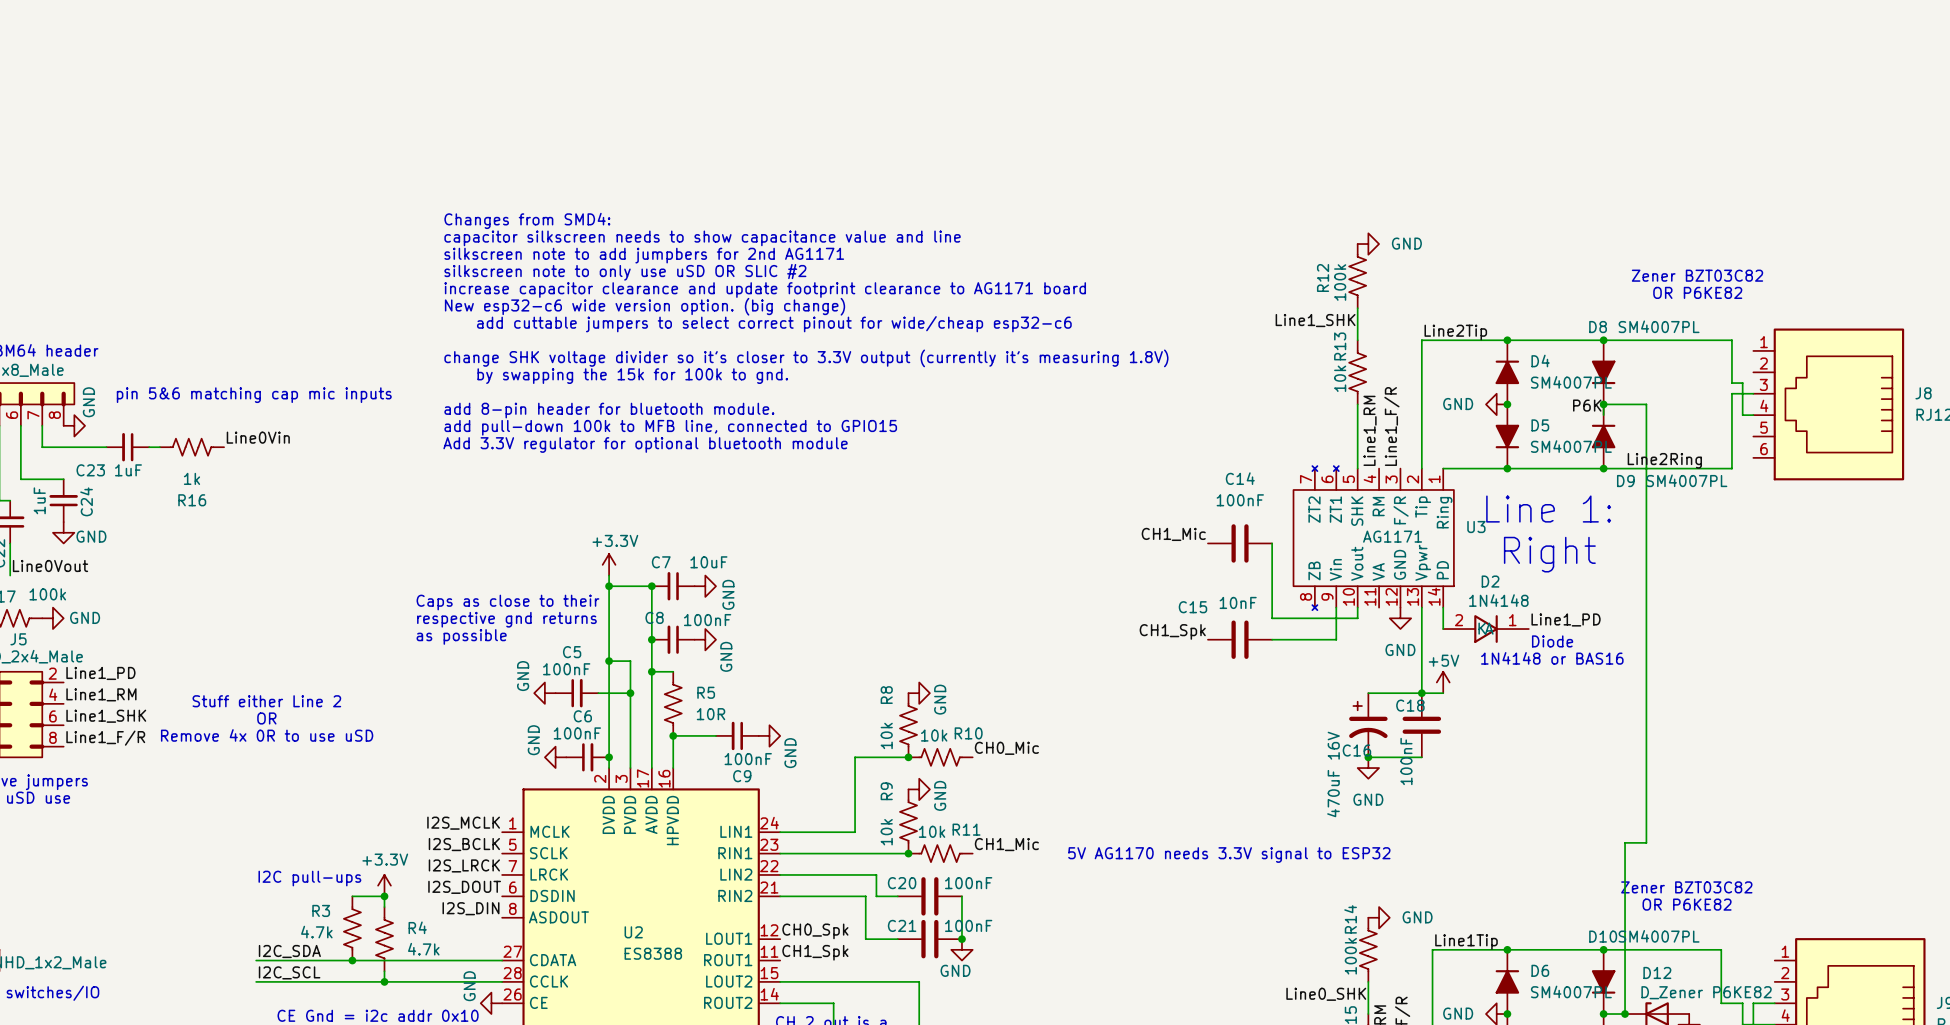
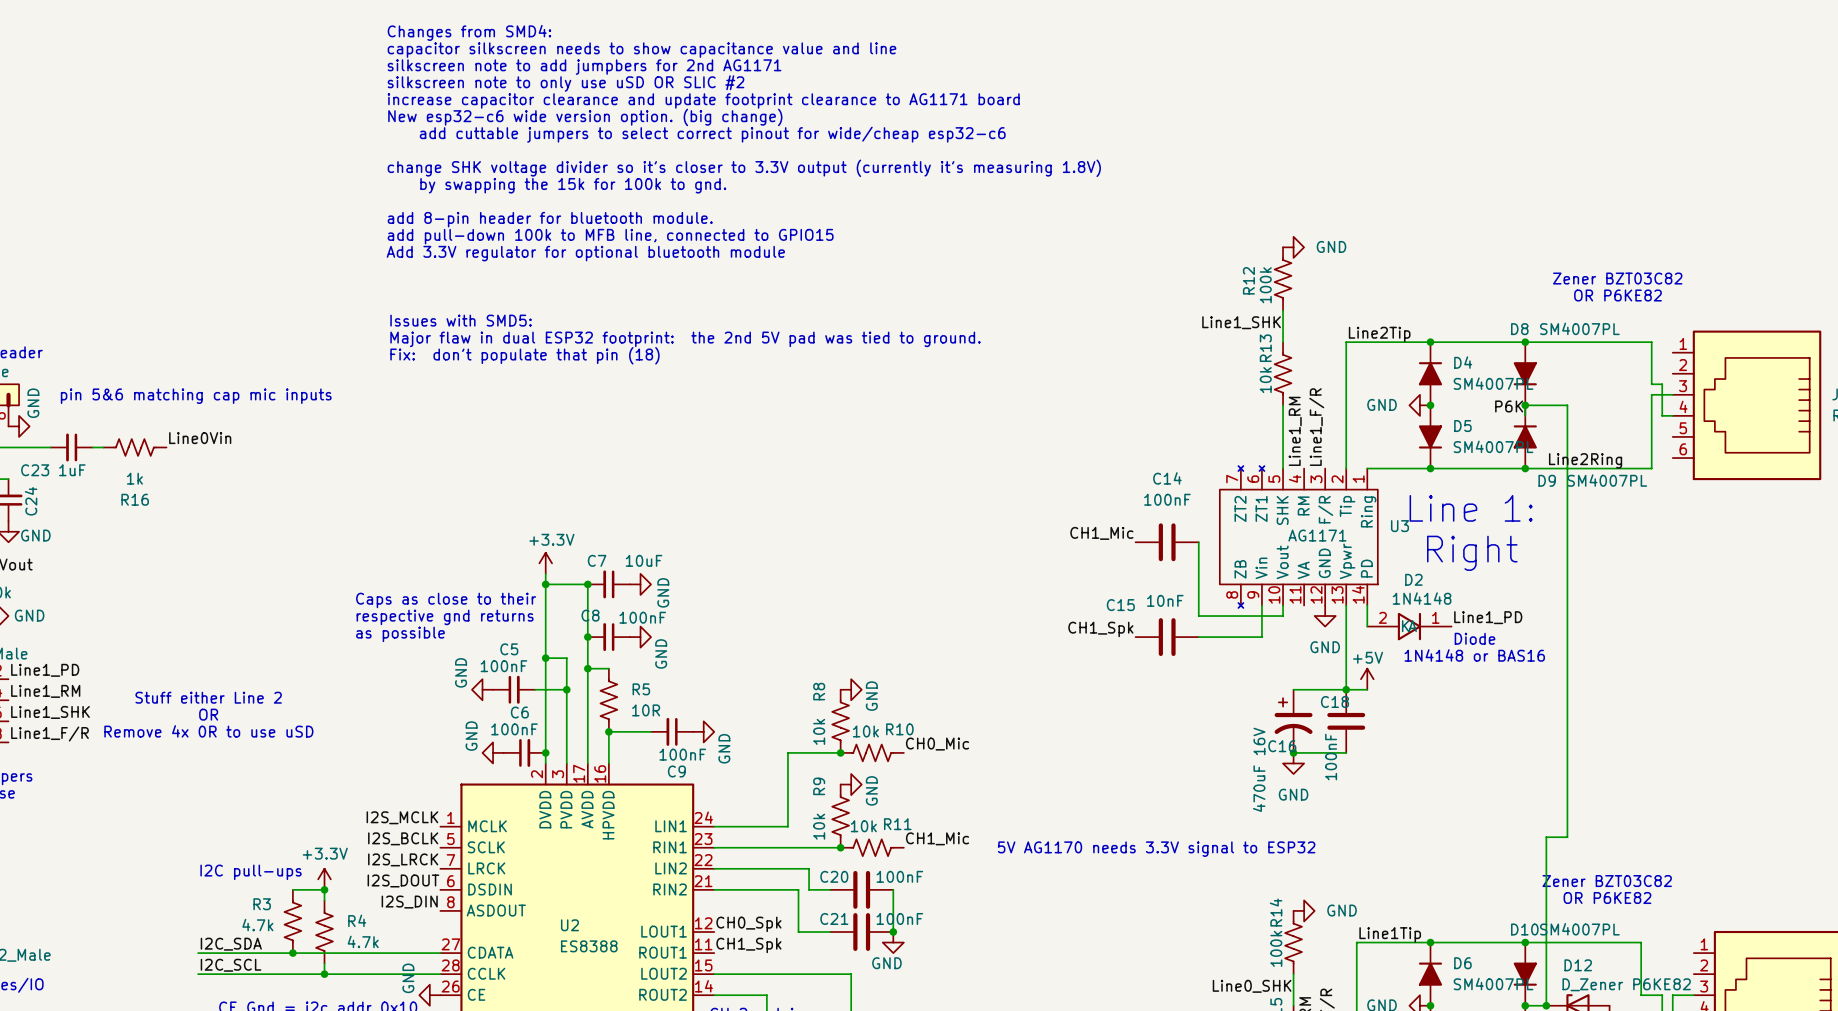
text position: Changes from SMD4: (527, 220) -> Changes from SMD4: (469, 32)
text position: capacitor silkscreen needs to show capacitance value and line (702, 238) -> capacitor silkscreen needs to show capacitance value and line (641, 50)
text position: silkscreen note to add jumpbers for 2nd AG1171 (644, 255) -> silkscreen note to add jumpbers for 2nd AG1171 (584, 67)
text position: silkscreen note to only use uSD OR SLIC #2 (625, 272) -> silkscreen note to only use uSD OR SLIC #2 (566, 83)
text position: increase capacitor clearance and update footprint clearance to AG1171 board (765, 290) -> increase capacitor clearance and update footprint clearance to AG1171 board (703, 100)
text position: New esp32-c6 wide version option. (big change) (645, 306) -> New esp32-c6 wide version option. (big change) (585, 117)
text: none -> Issues with SMD5: (461, 320)
text position: add cuttable jumpers to select correct pinout for wide/cheap esp32-c6 (774, 324) -> add cuttable jumpers to select correct pinout for wide/cheap esp32-c6 (712, 134)
text: none -> Major flaw in dual ESP32 footprint: the 2nd 5V pad was tied to ground. (685, 339)
text: none -> Fix: don't populate that pin (18) (524, 355)
text position: change SHK voltage divider so it's closer to 3.3V output (currently it's measuring 1.8V) (806, 358) -> change SHK voltage divider so it's closer to 3.3V output (currently it's measuring 1.8V) (744, 168)
text position: by swapping the 15k for 100k to gnd. (632, 376) -> by swapping the 15k for 100k to gnd. (573, 185)
text position: add 8-pin header for bluetooth module. (609, 410) -> add 8-pin header for bluetooth module. (550, 219)
text position: add pull-down 100k to MFB line, connected to GPIO15 (670, 427) -> add pull-down 100k to MFB line, connected to GPIO15 (610, 236)
text position: Add 3.3V regulator for optional bluetooth module (645, 444) -> Add 3.3V regulator for optional bluetooth module (585, 253)

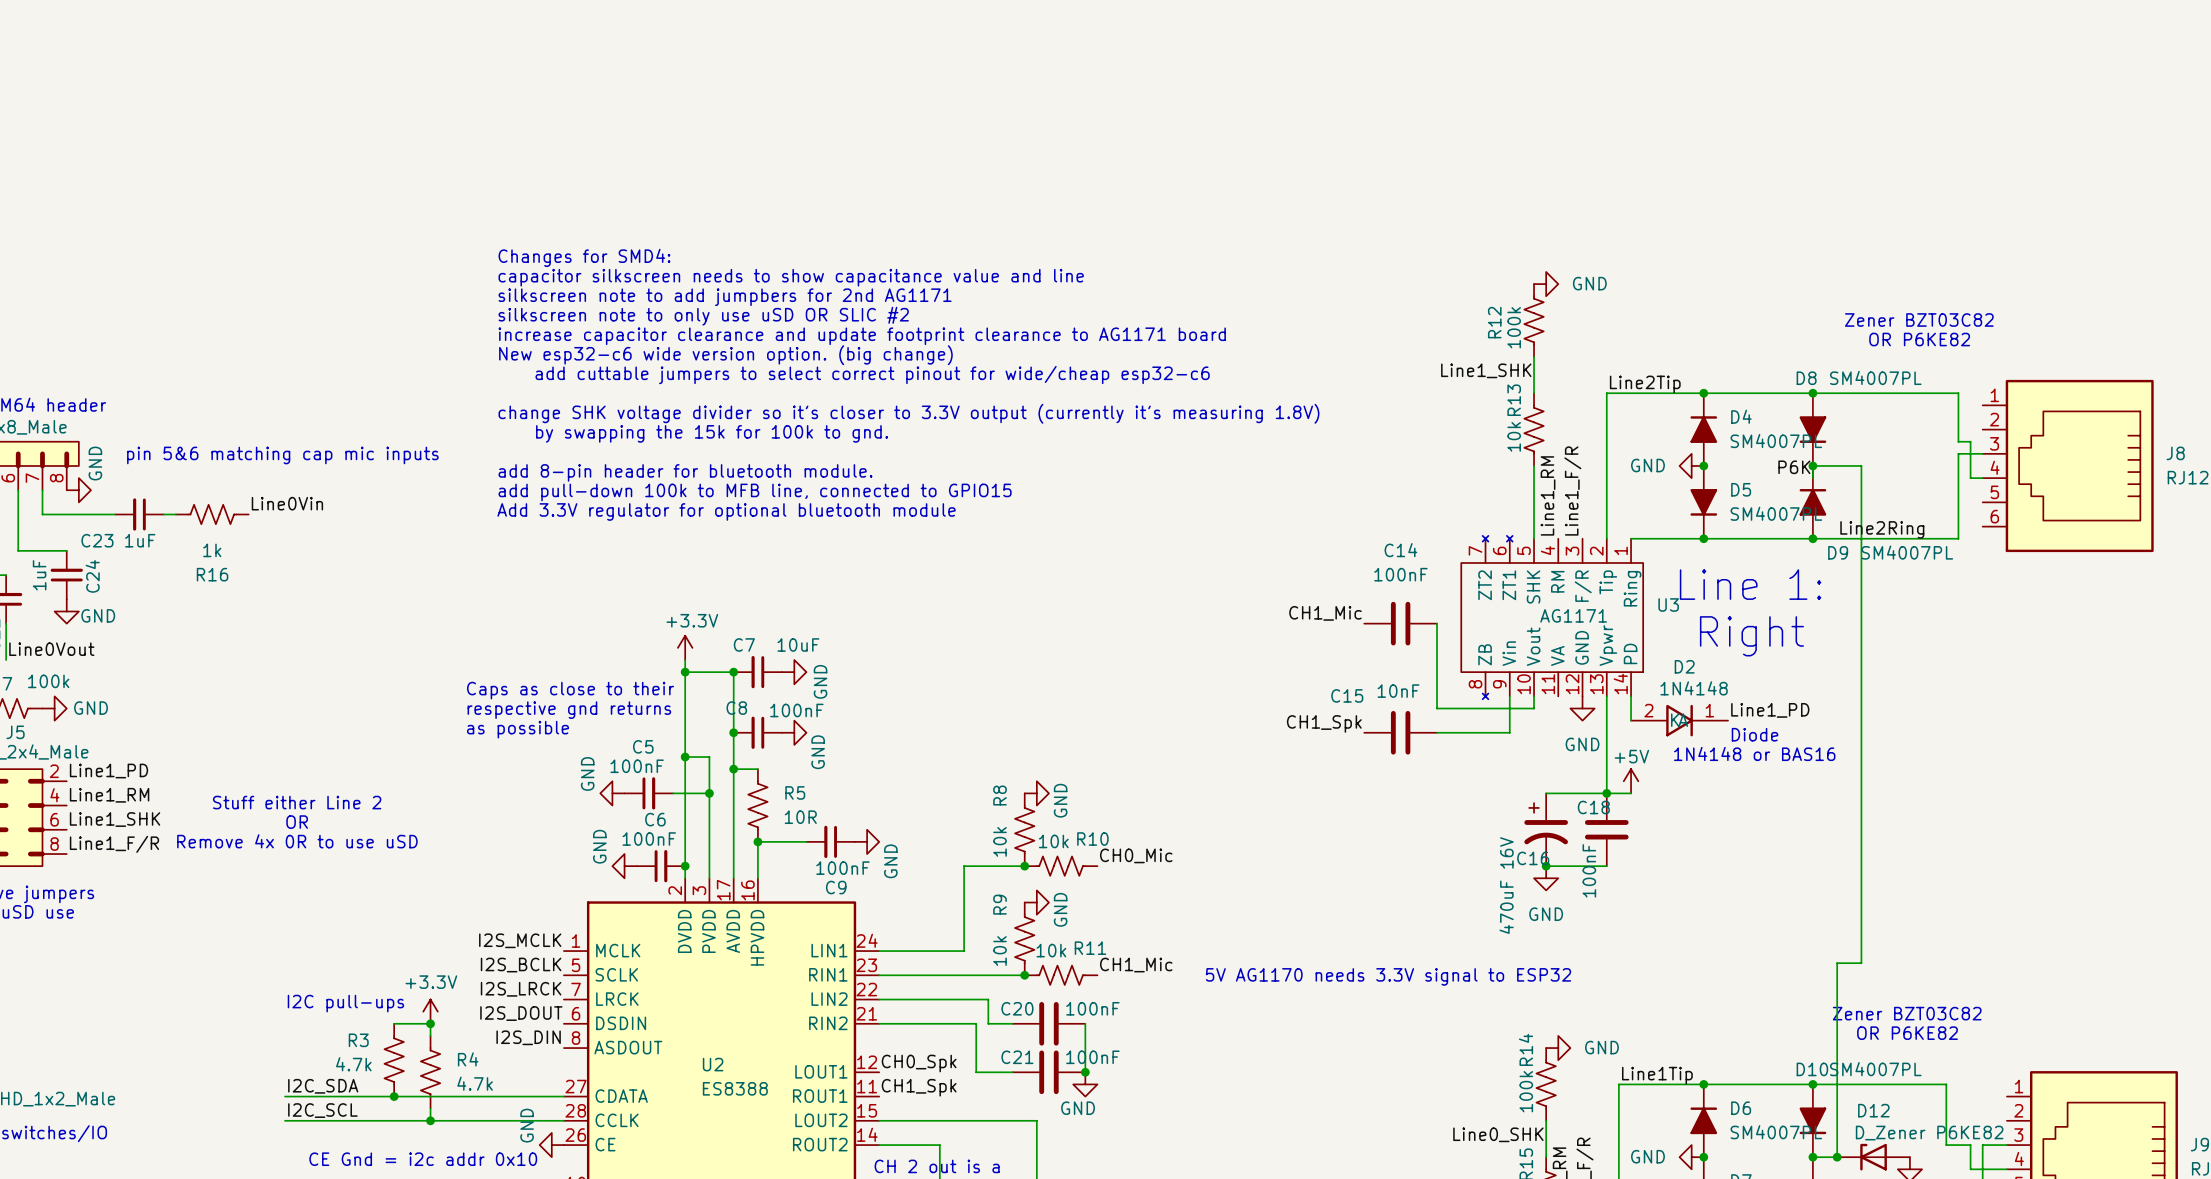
text: Changes from SMD4: (469, 32) -> none
text position: capacitor silkscreen needs to show capacitance value and line (641, 50) -> capacitor silkscreen needs to show capacitance value and line (791, 277)
text position: silkscreen note to add jumpbers for 2nd AG1171 (584, 67) -> silkscreen note to add jumpbers for 2nd AG1171 (725, 297)
text position: silkscreen note to only use uSD OR SLIC #2 (566, 83) -> silkscreen note to only use uSD OR SLIC #2 (703, 316)
text position: increase capacitor clearance and update footprint clearance to AG1171 board (703, 100) -> increase capacitor clearance and update footprint clearance to AG1171 board (862, 336)
text position: New esp32-c6 wide version option. (big change) (585, 117) -> New esp32-c6 wide version option. (big change) (725, 355)
text position: add cuttable jumpers to select correct pinout for wide/cheap esp32-c6 (712, 134) -> add cuttable jumpers to select correct pinout for wide/cheap esp32-c6 (872, 375)
text position: change SHK voltage divider so it's closer to 3.3V output (currently it's measuring 1.8V) (744, 168) -> change SHK voltage divider so it's closer to 3.3V output (currently it's measuring 1.8V) (908, 413)
text position: by swapping the 15k for 100k to gnd. (573, 185) -> by swapping the 15k for 100k to gnd. (712, 433)
text position: add 8-pin header for bluetooth module. (550, 219) -> add 8-pin header for bluetooth module. (685, 472)
text: none -> Changes for SMD4: (584, 257)
text position: add pull-down 100k to MFB line, connected to GPIO15 (610, 236) -> add pull-down 100k to MFB line, connected to GPIO15 (755, 492)
text position: Add 3.3V regulator for optional bluetooth module (585, 253) -> Add 3.3V regulator for optional bluetooth module (726, 511)
text: Issues with SMD5: (461, 320) -> none
text: Major flaw in dual ESP32 footprint: the 2nd 5V pad was tied to ground. (685, 339) -> none
text: Fix: don't populate that pin (18) (524, 355) -> none

